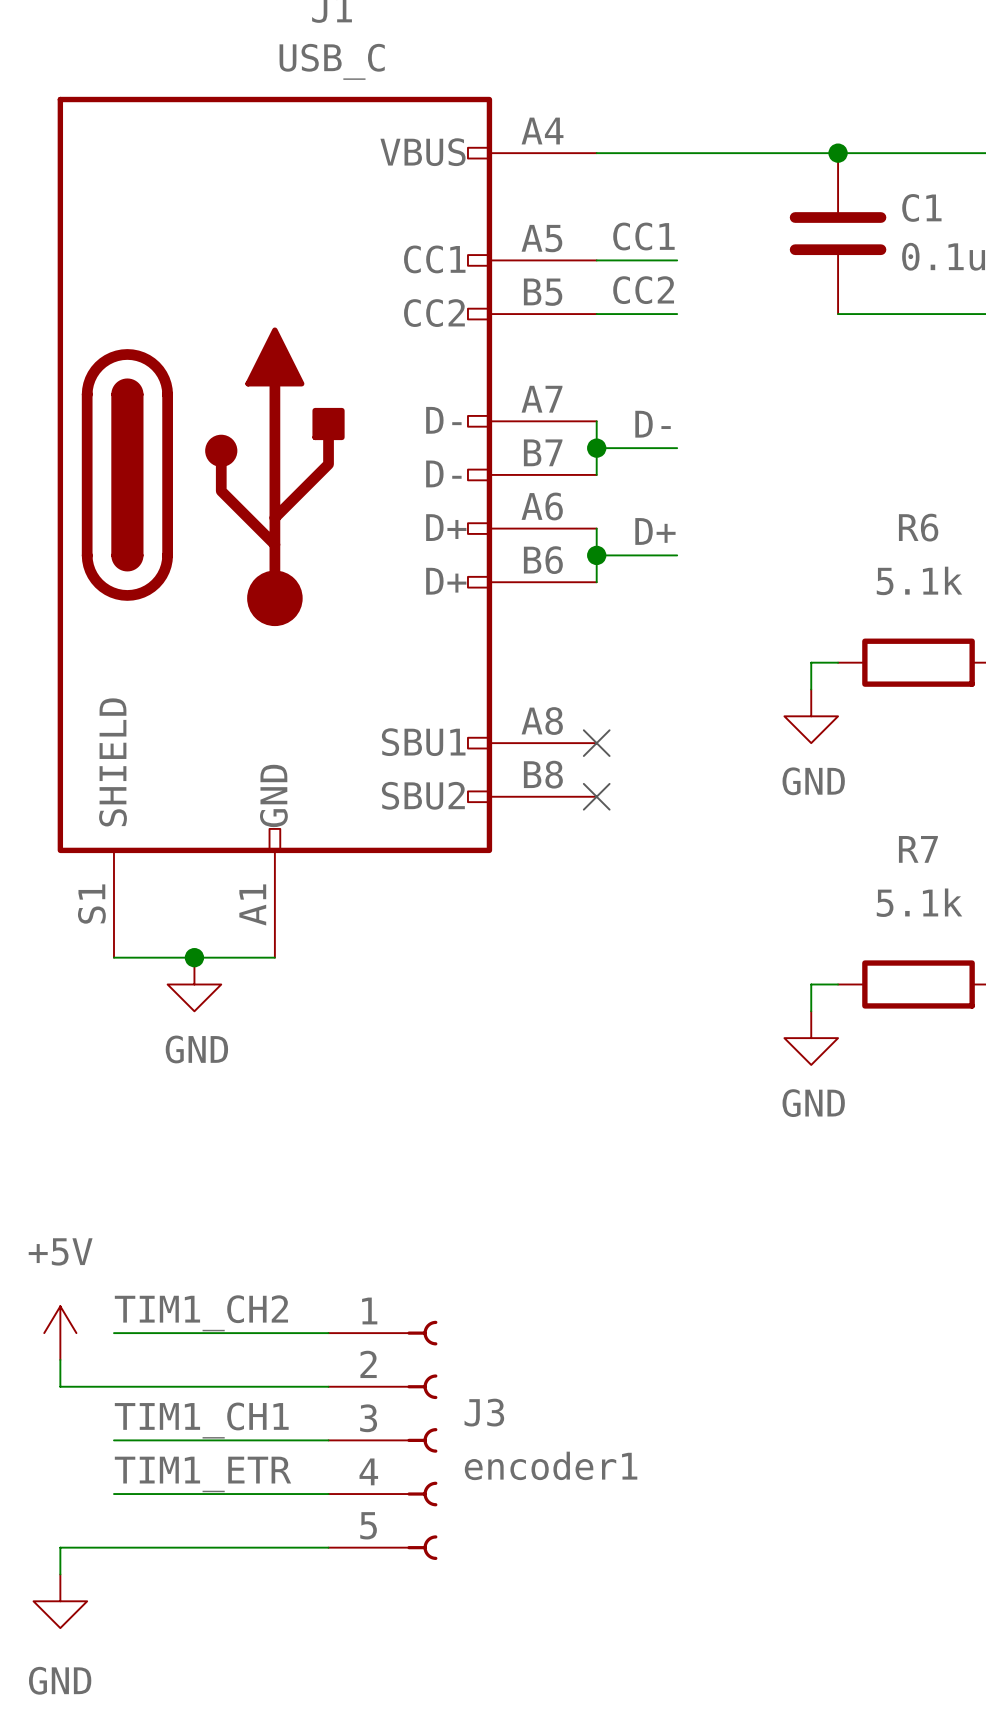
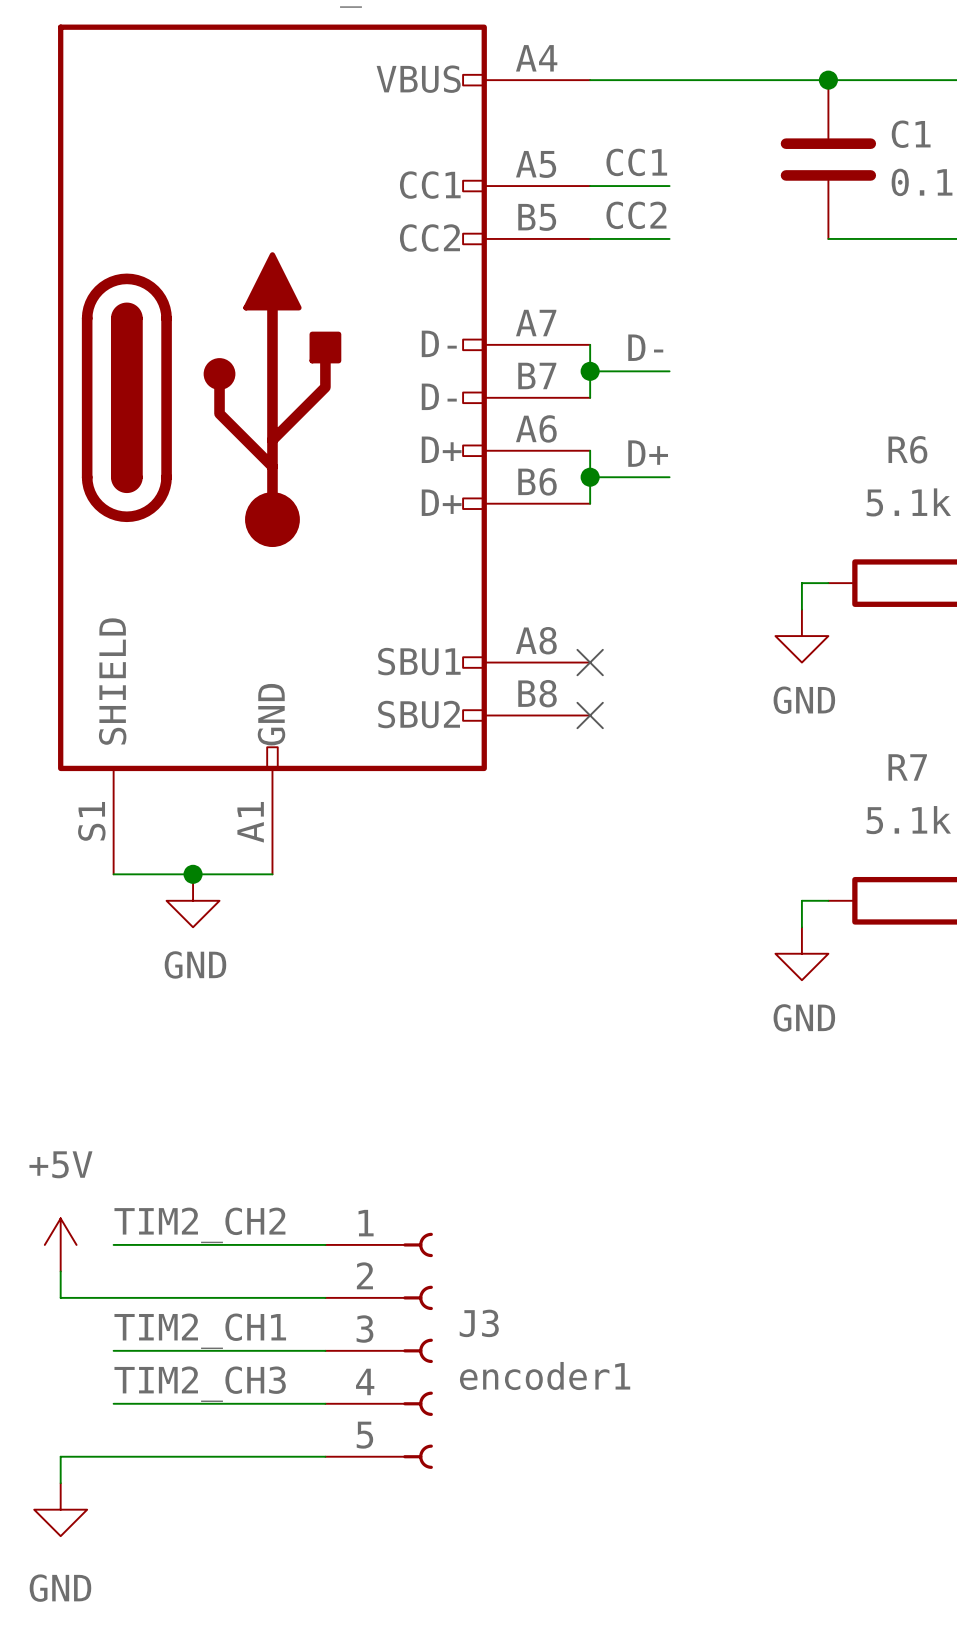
label: TIM1_CH2 (201, 1313) -> TIM2_CH2 (199, 1225)
label: TIM1_CH1 (201, 1420) -> TIM2_CH1 (200, 1331)
label: TIM1_ETR (202, 1474) -> TIM2_CH3 (200, 1384)

